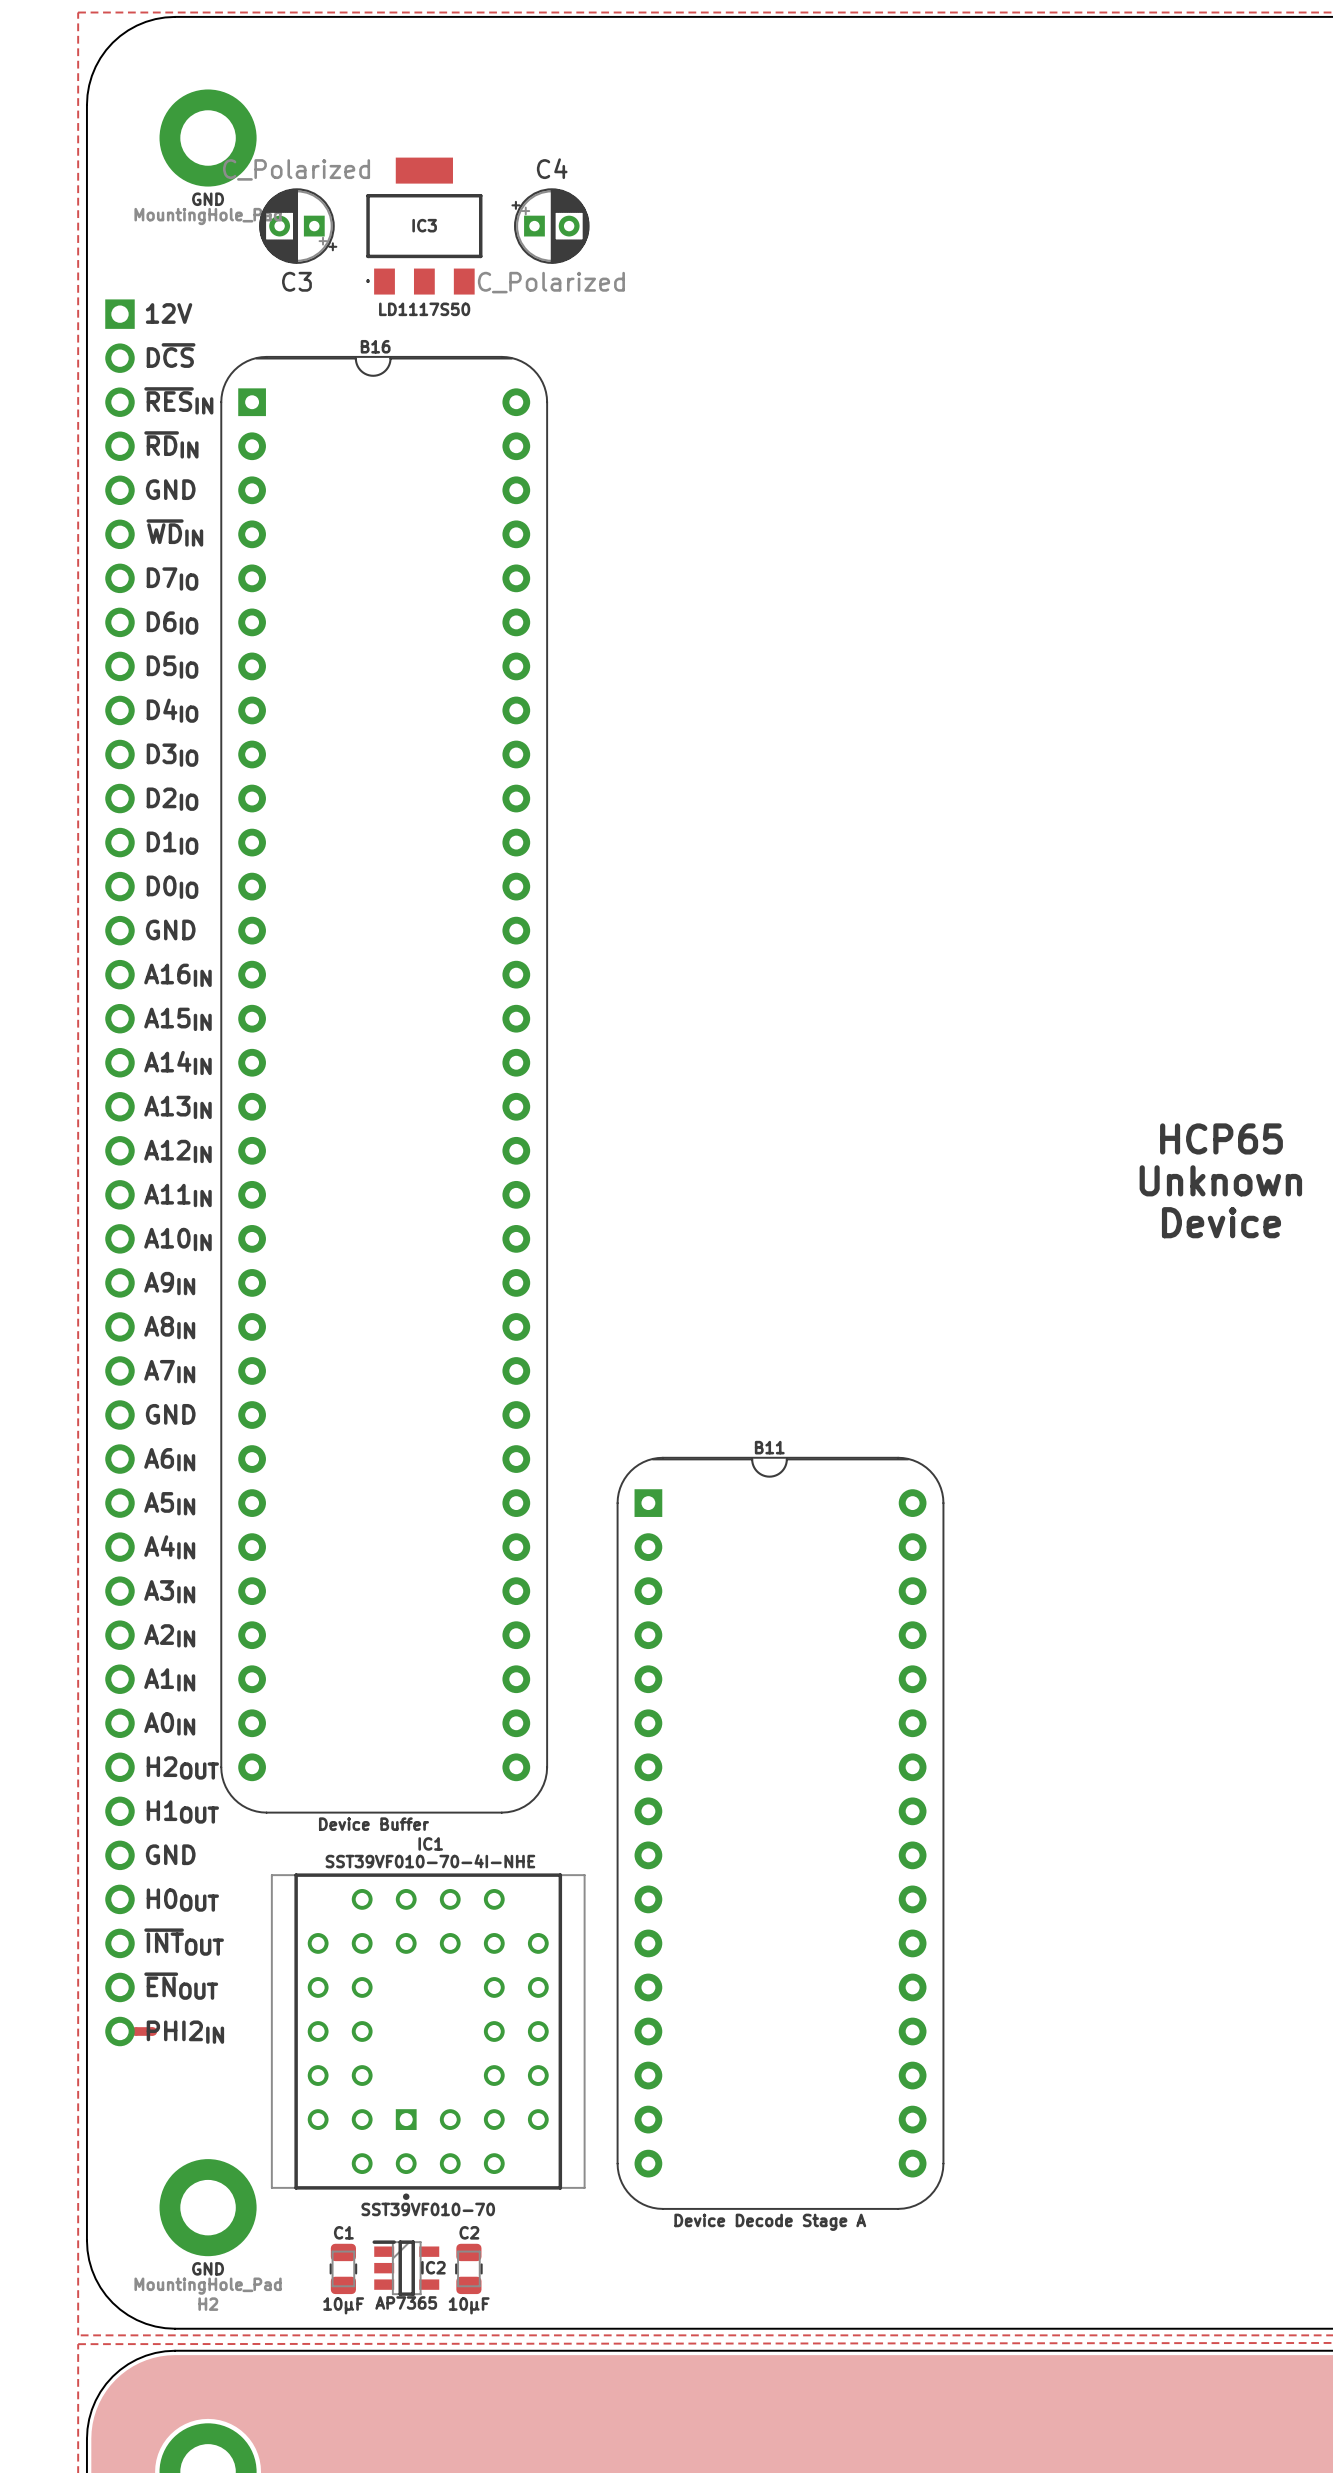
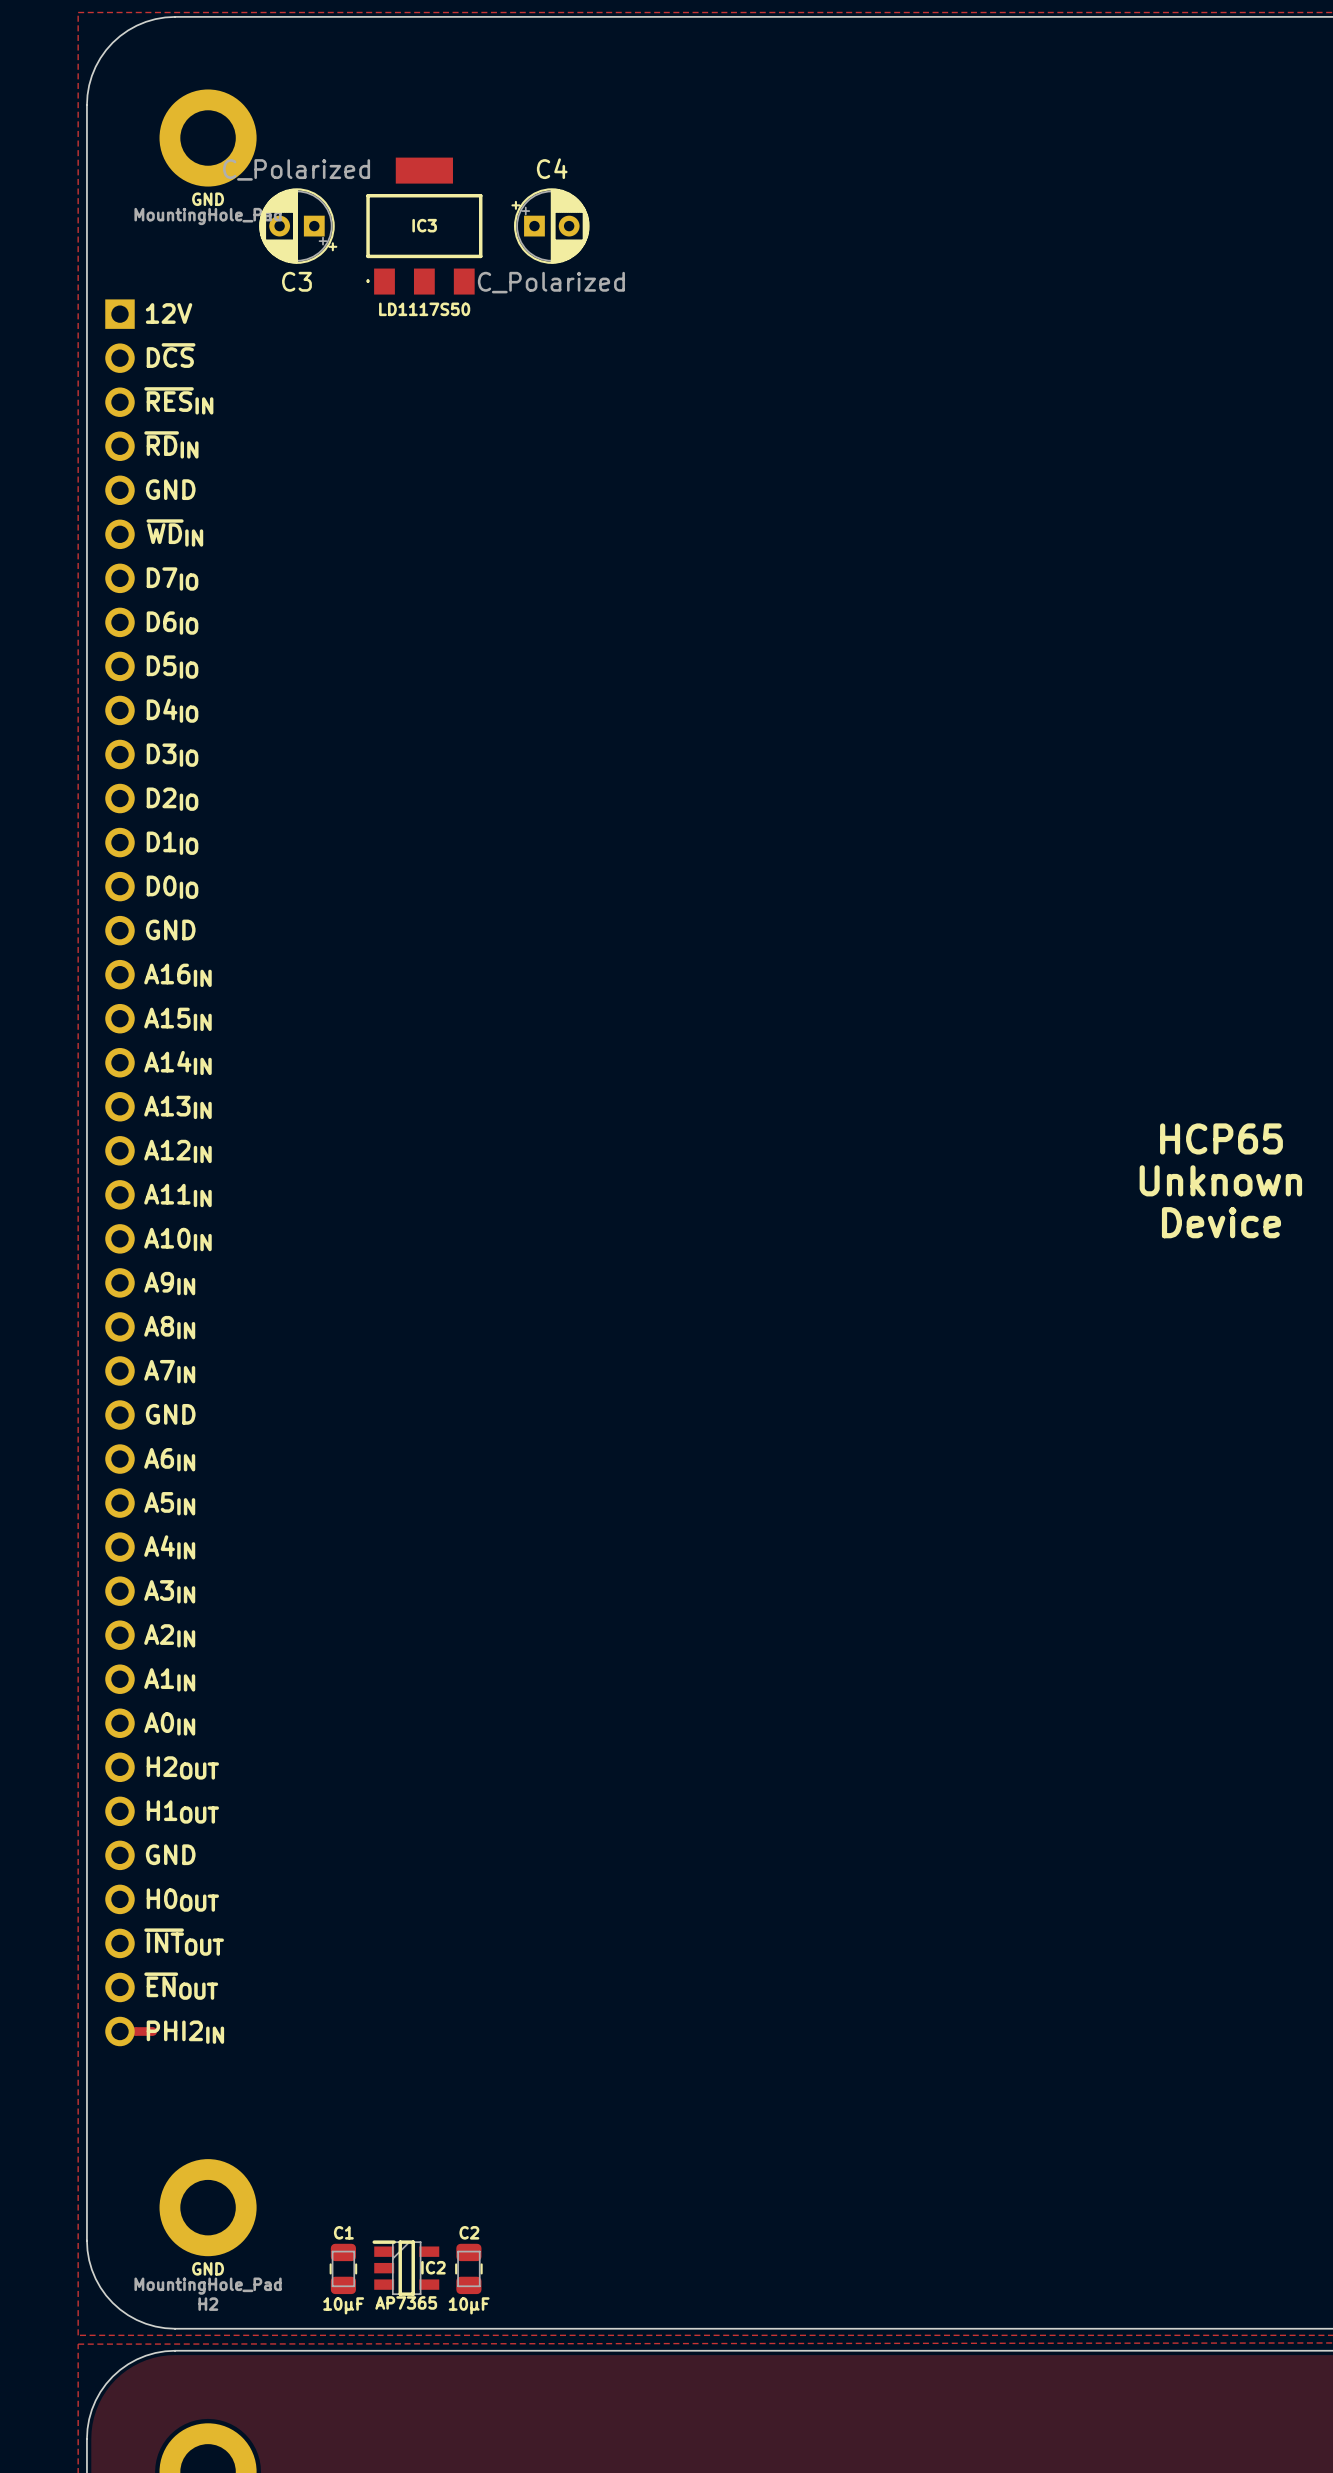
B16: (384, 1084) -> none
B11: (780, 1833) -> none
IC1: SST39VF010-70-4I-NHE (428, 2036) -> none

